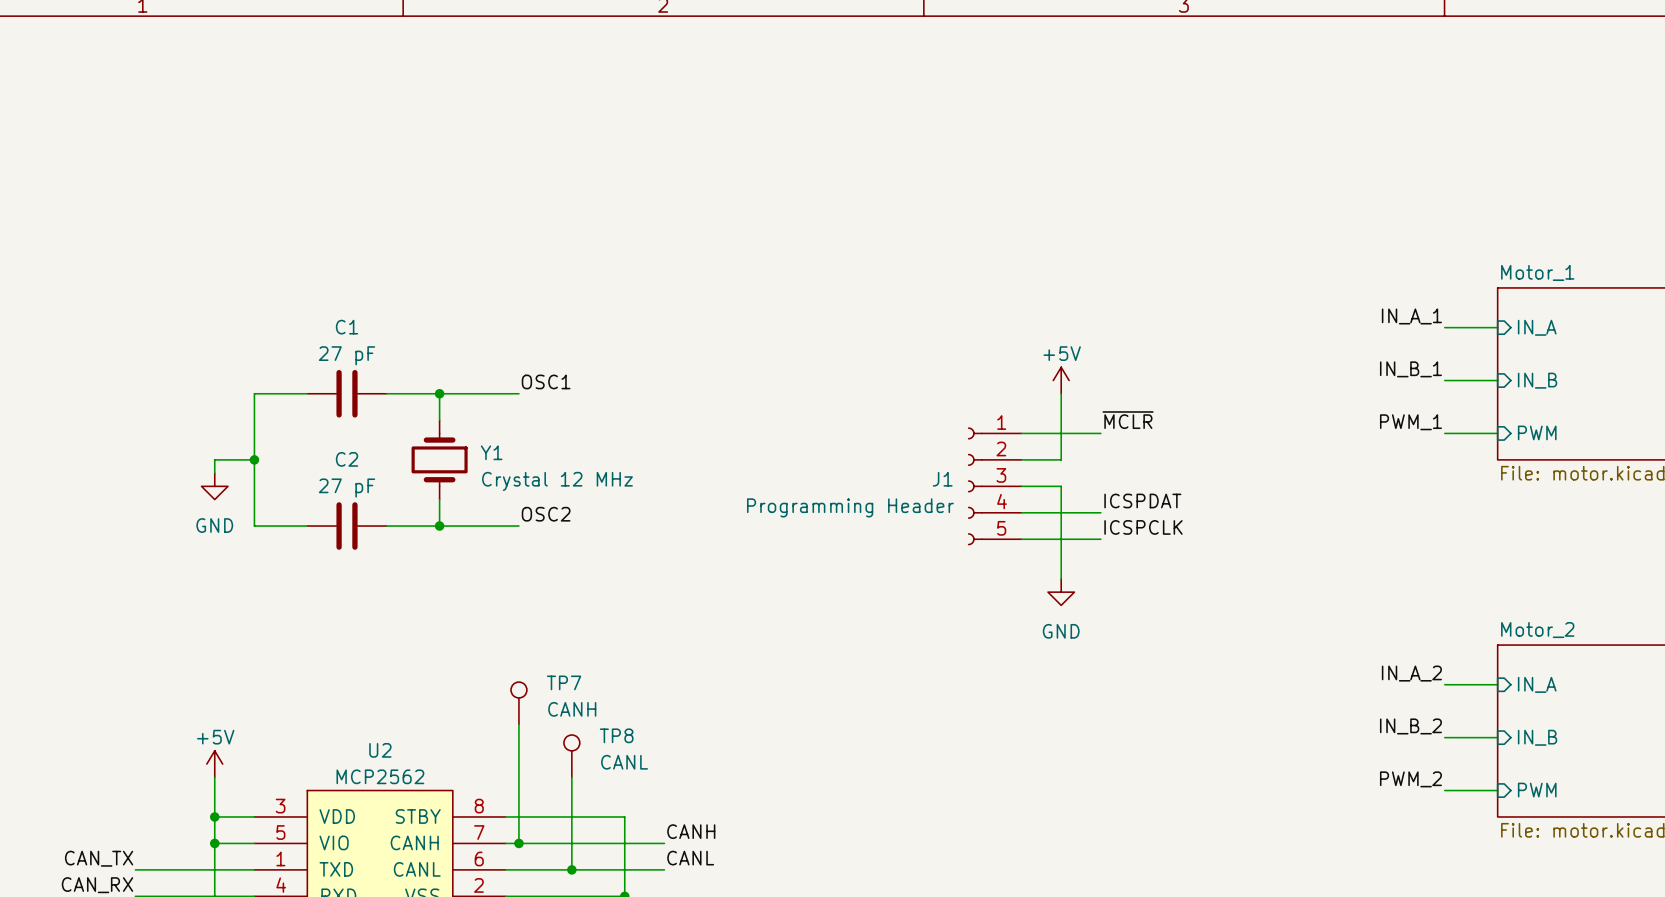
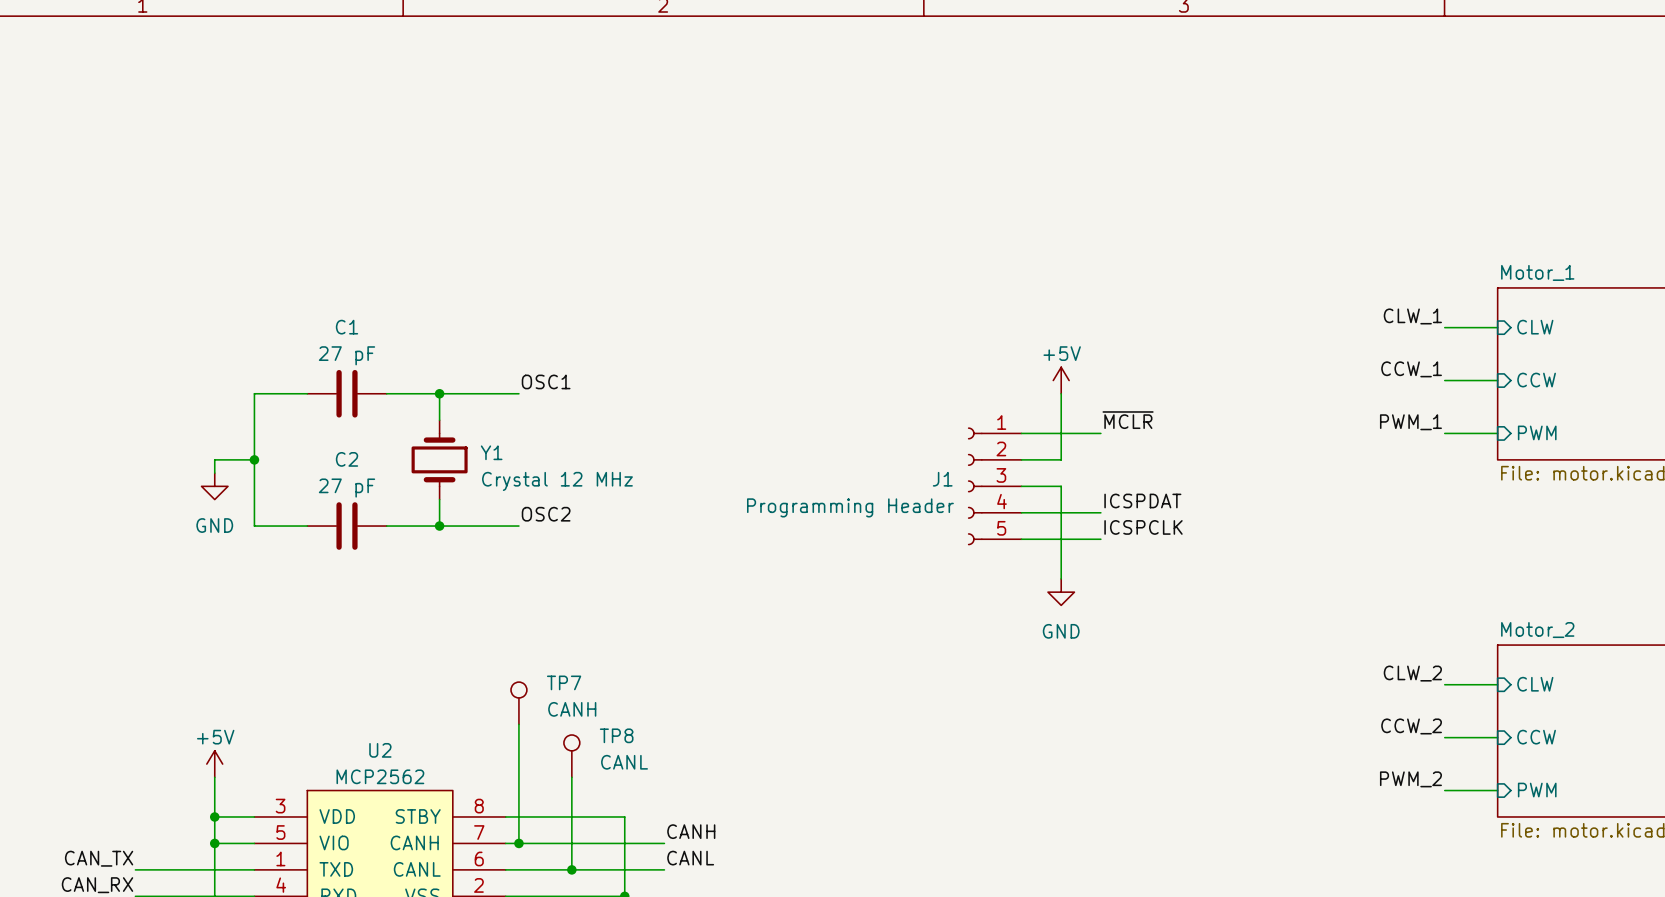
label: IN_A_1 (1411, 316) -> CLW_1 (1412, 316)
sheet pin: IN_A (1537, 327) -> CLW (1535, 327)
label: IN_B_1 (1410, 369) -> CCW_1 (1411, 369)
sheet pin: IN_B (1537, 380) -> CCW (1536, 380)
label: IN_A_2 (1411, 673) -> CLW_2 (1412, 673)
sheet pin: IN_A (1537, 684) -> CLW (1535, 684)
label: IN_B_2 (1410, 726) -> CCW_2 (1411, 726)
sheet pin: IN_B (1537, 737) -> CCW (1536, 737)

